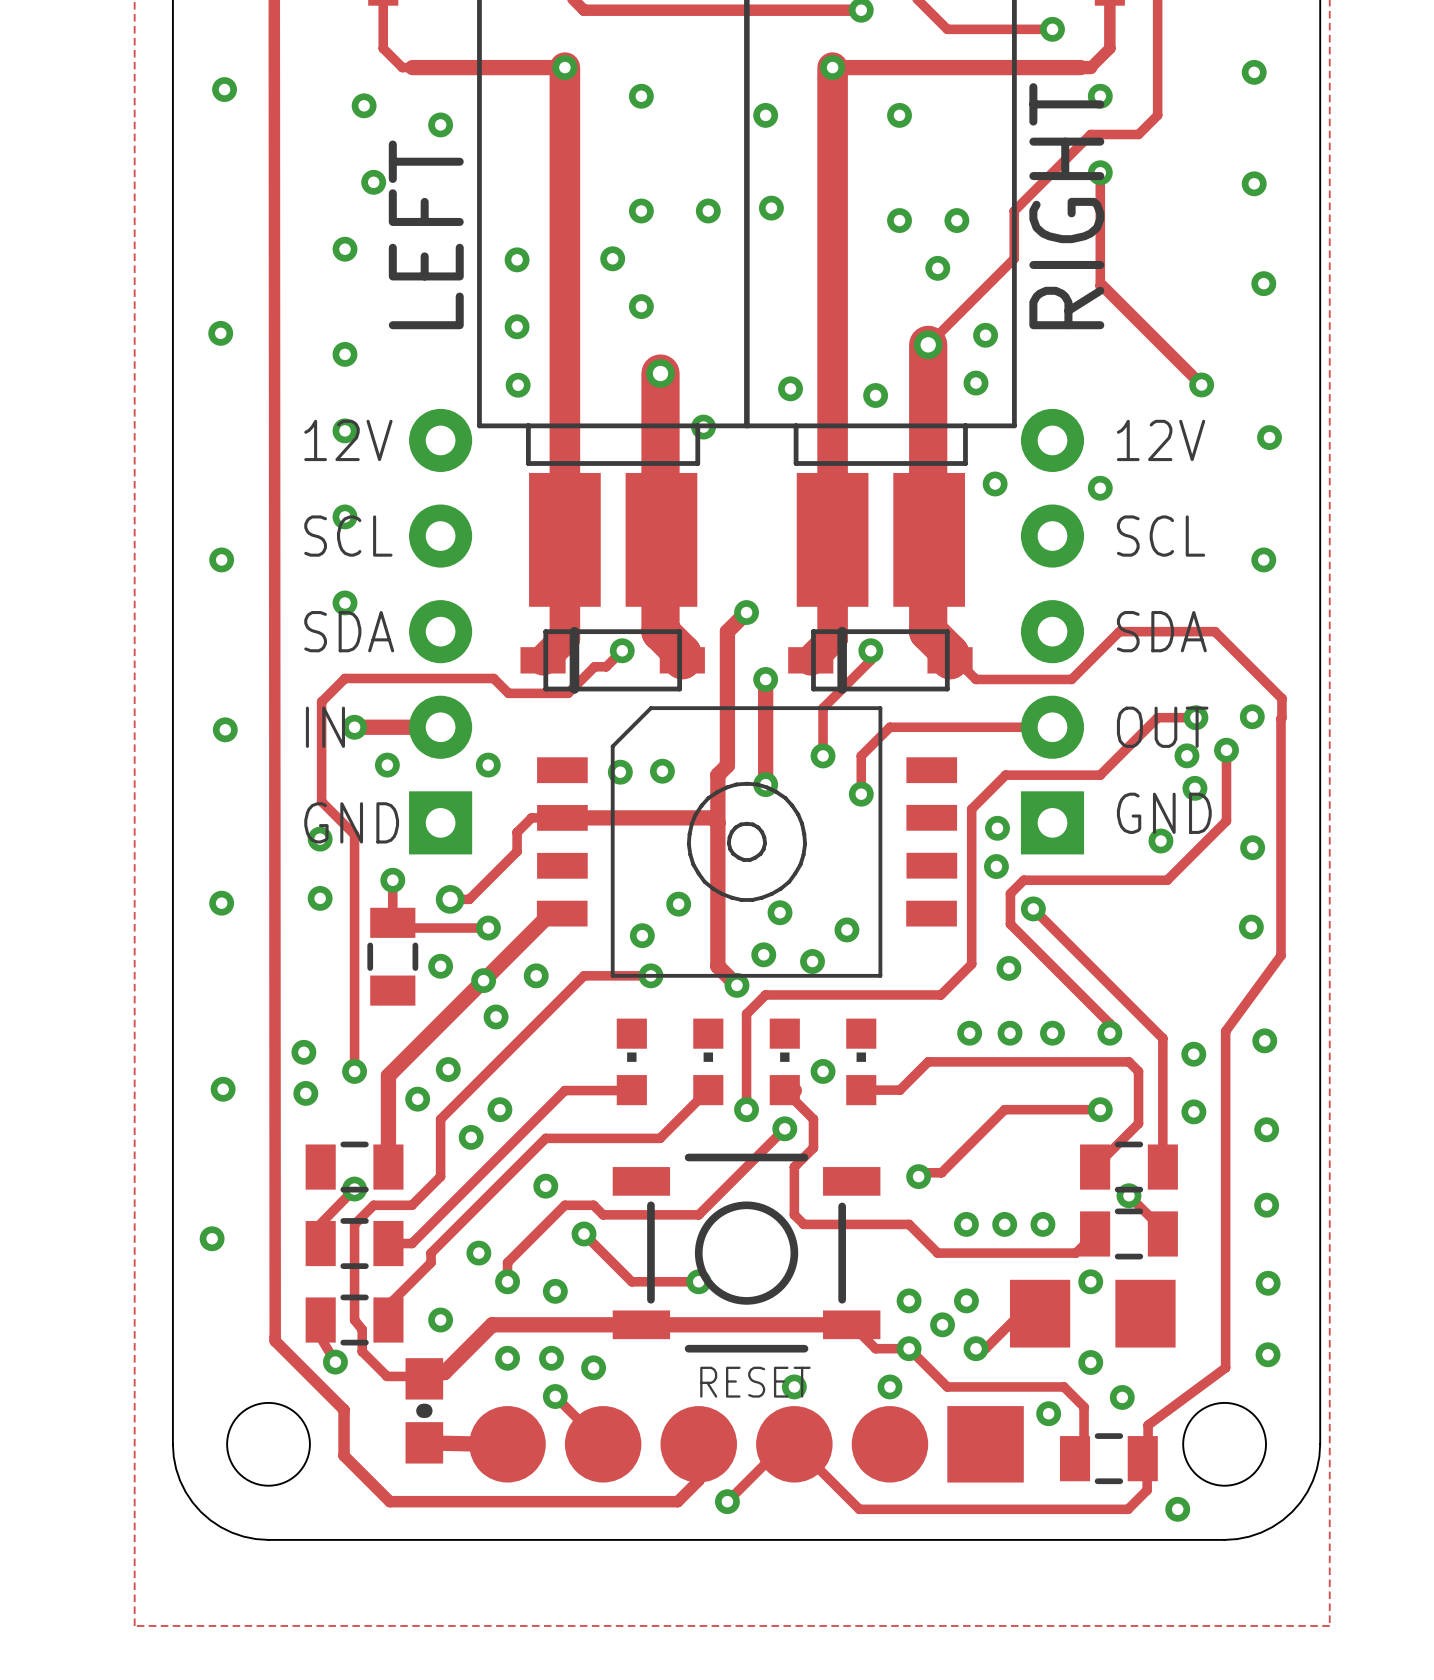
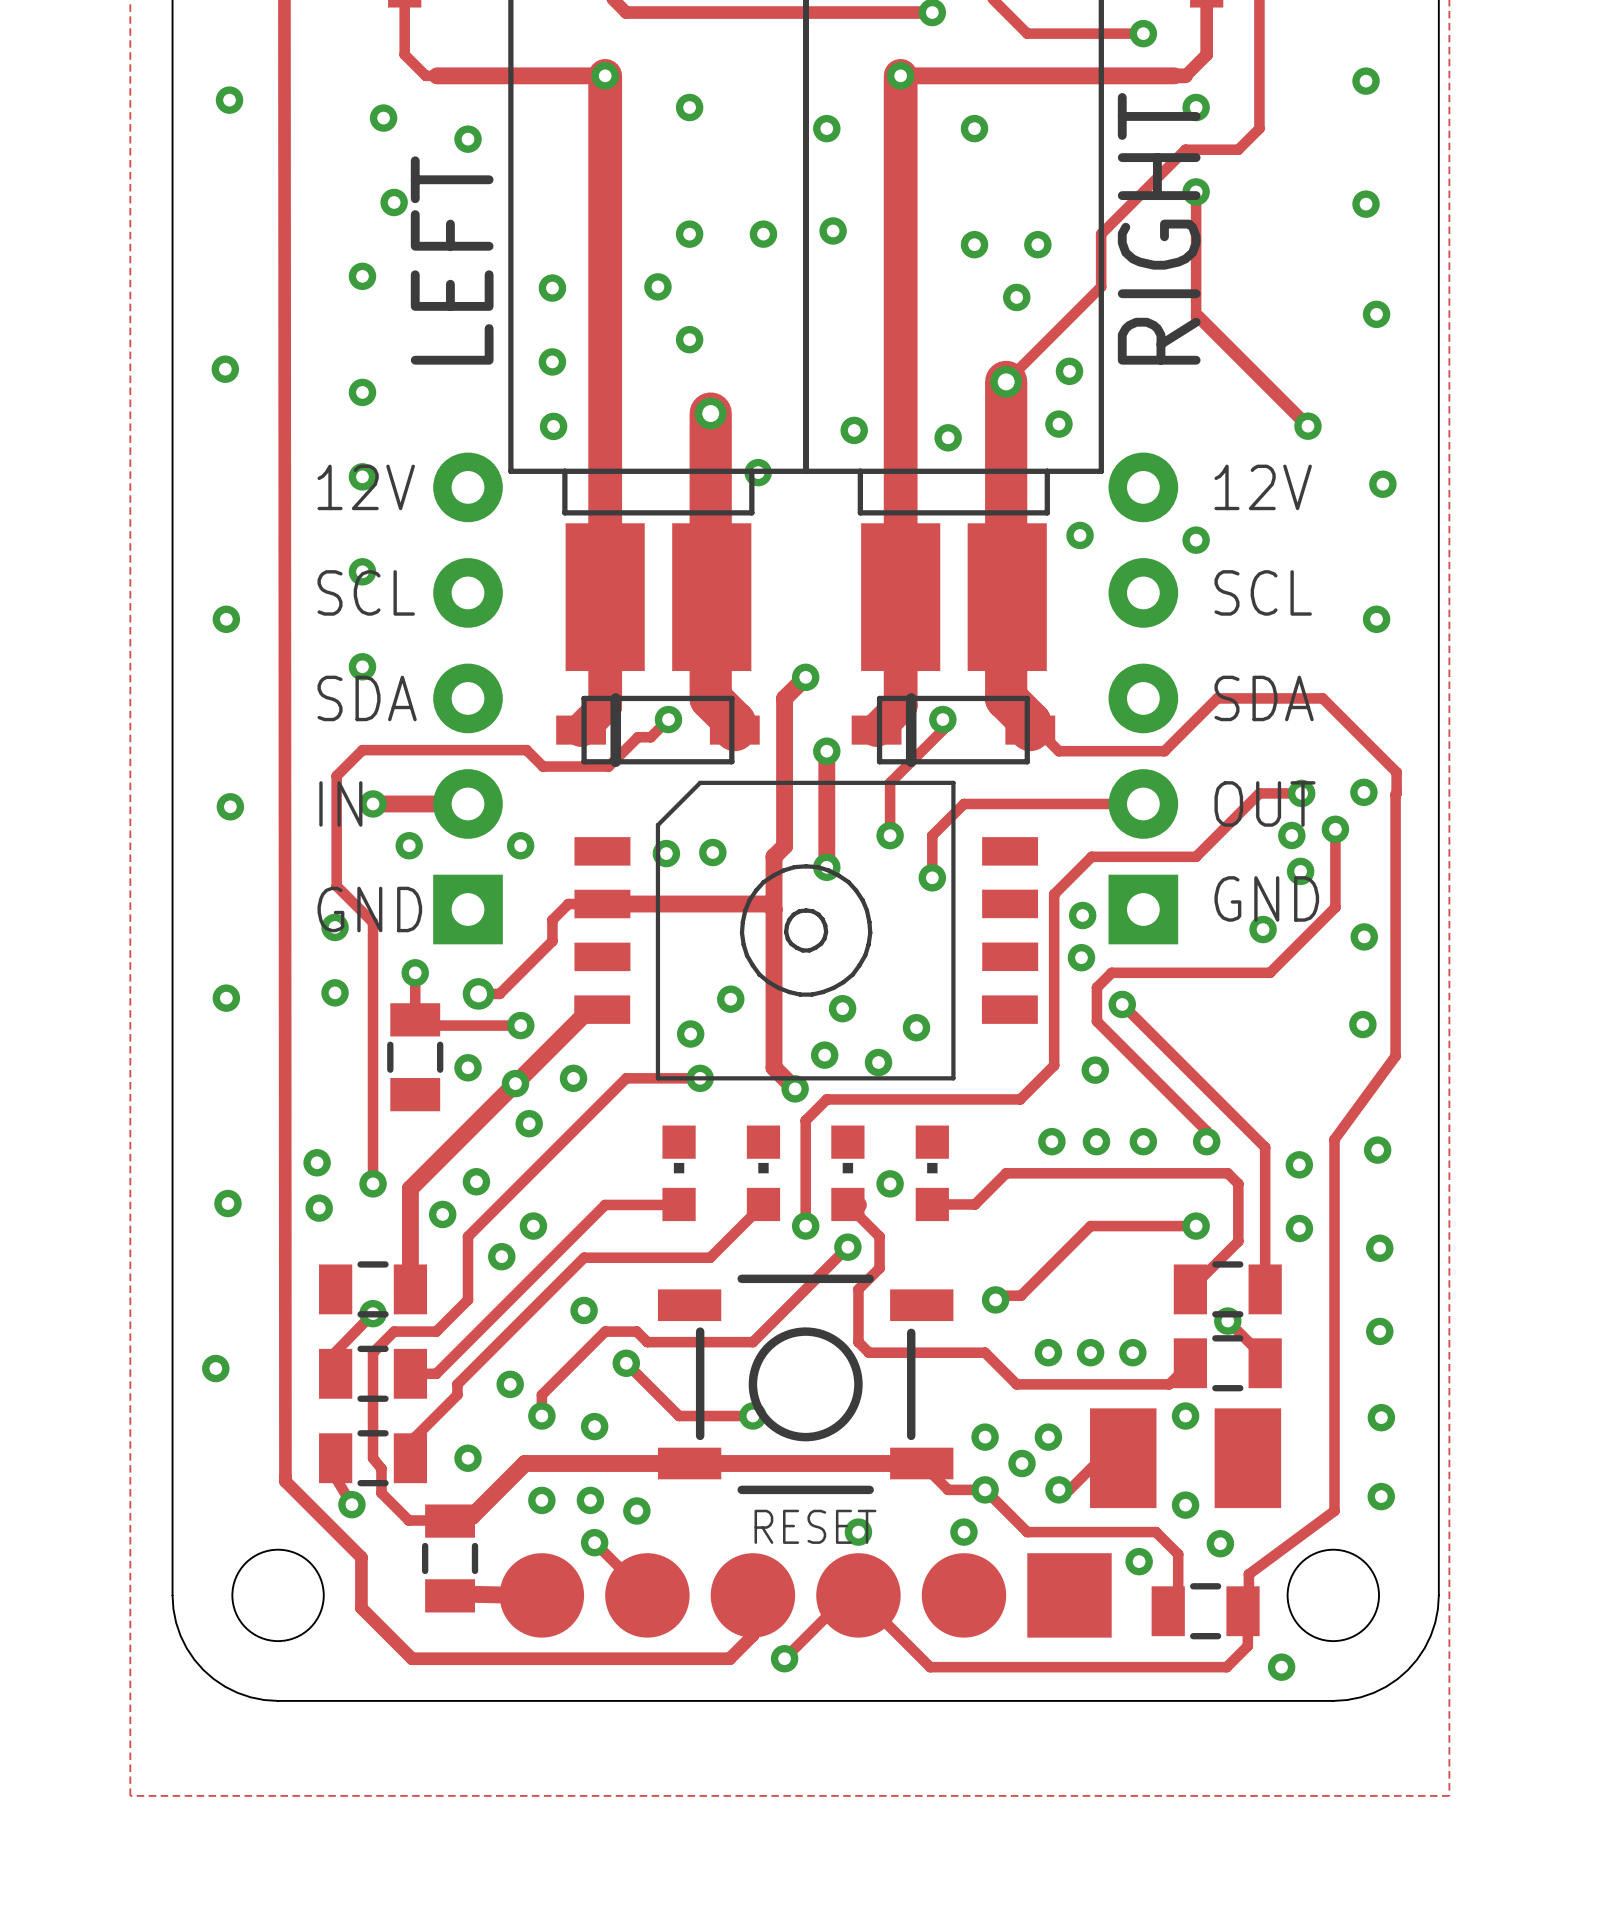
part footprint: [1009, 1279, 1176, 1348] -> [1090, 1408, 1282, 1509]
part footprint: [405, 1358, 444, 1464] -> [421, 1504, 479, 1613]

